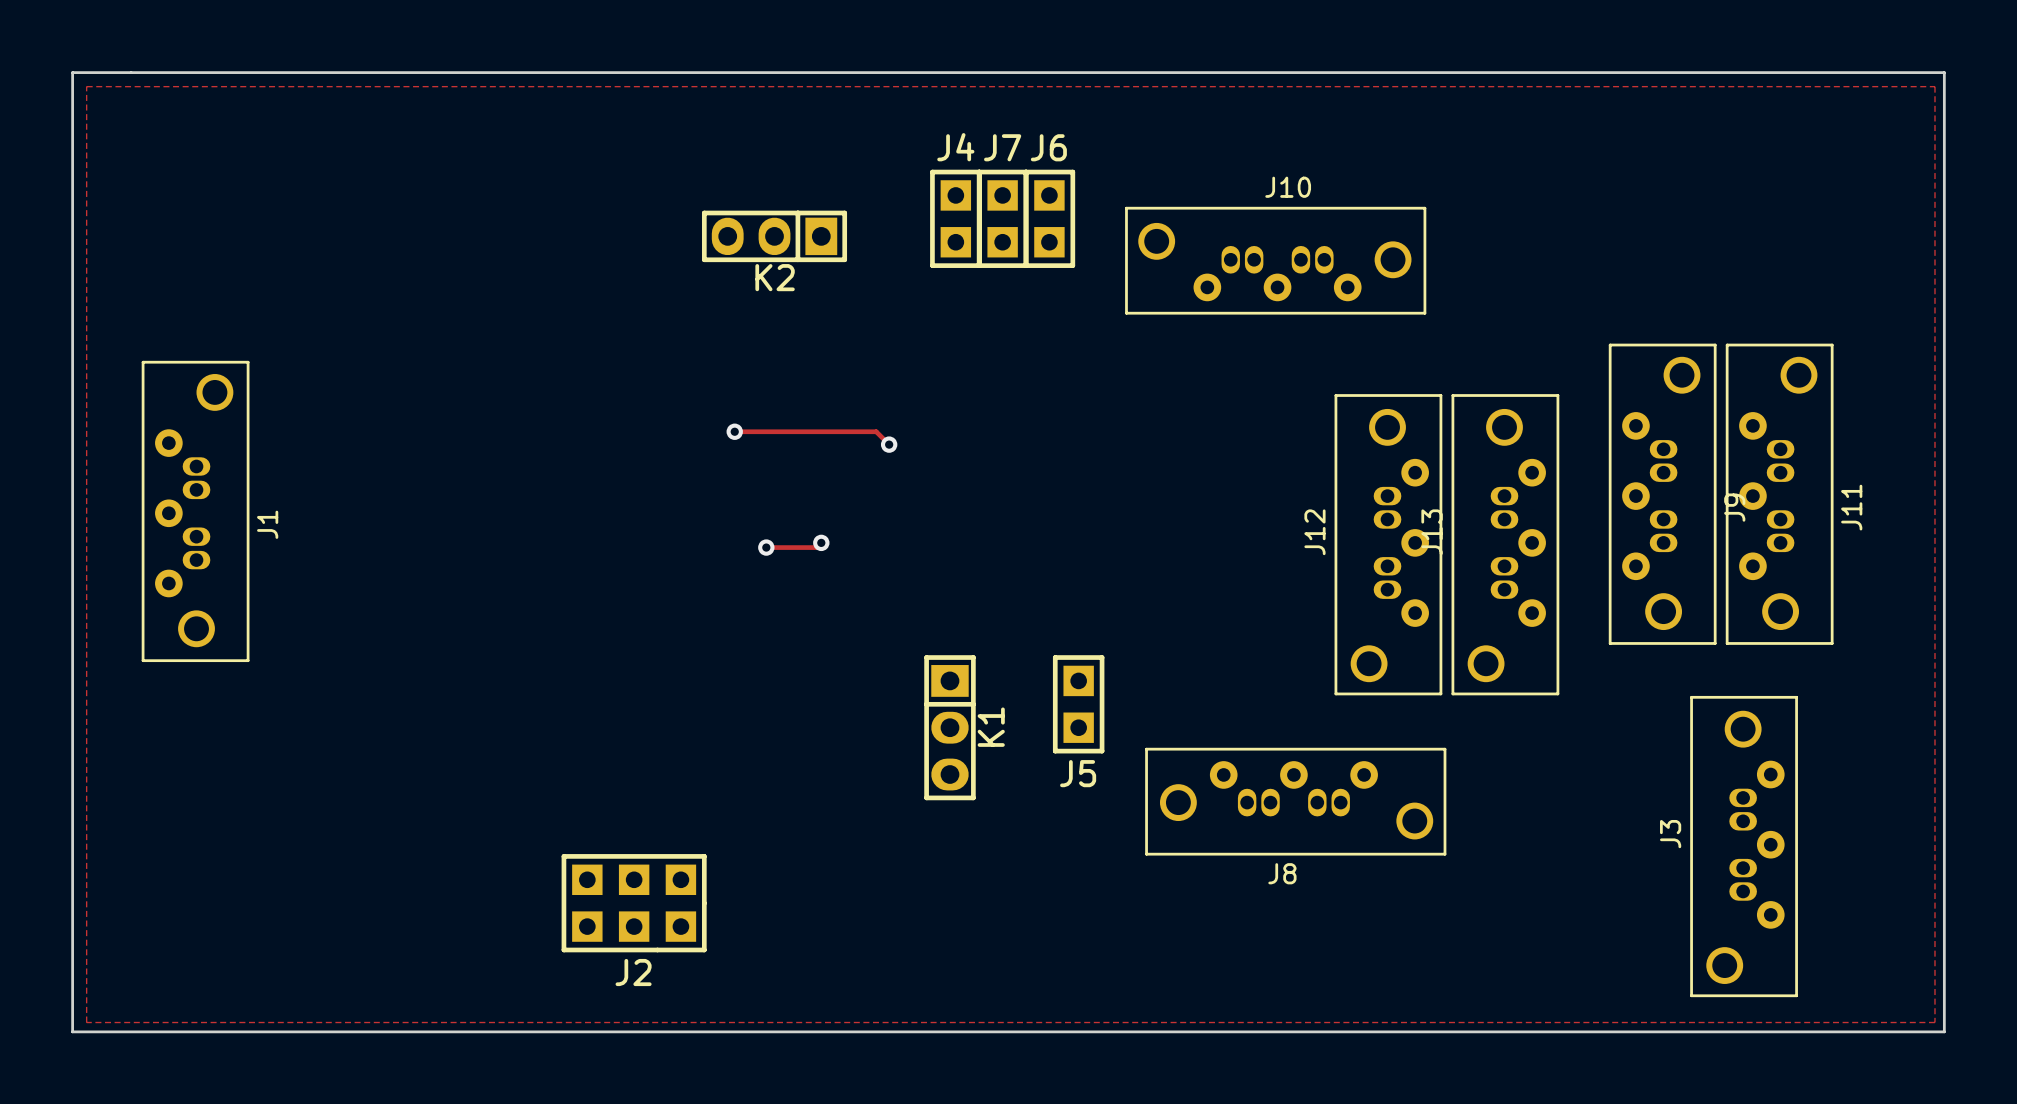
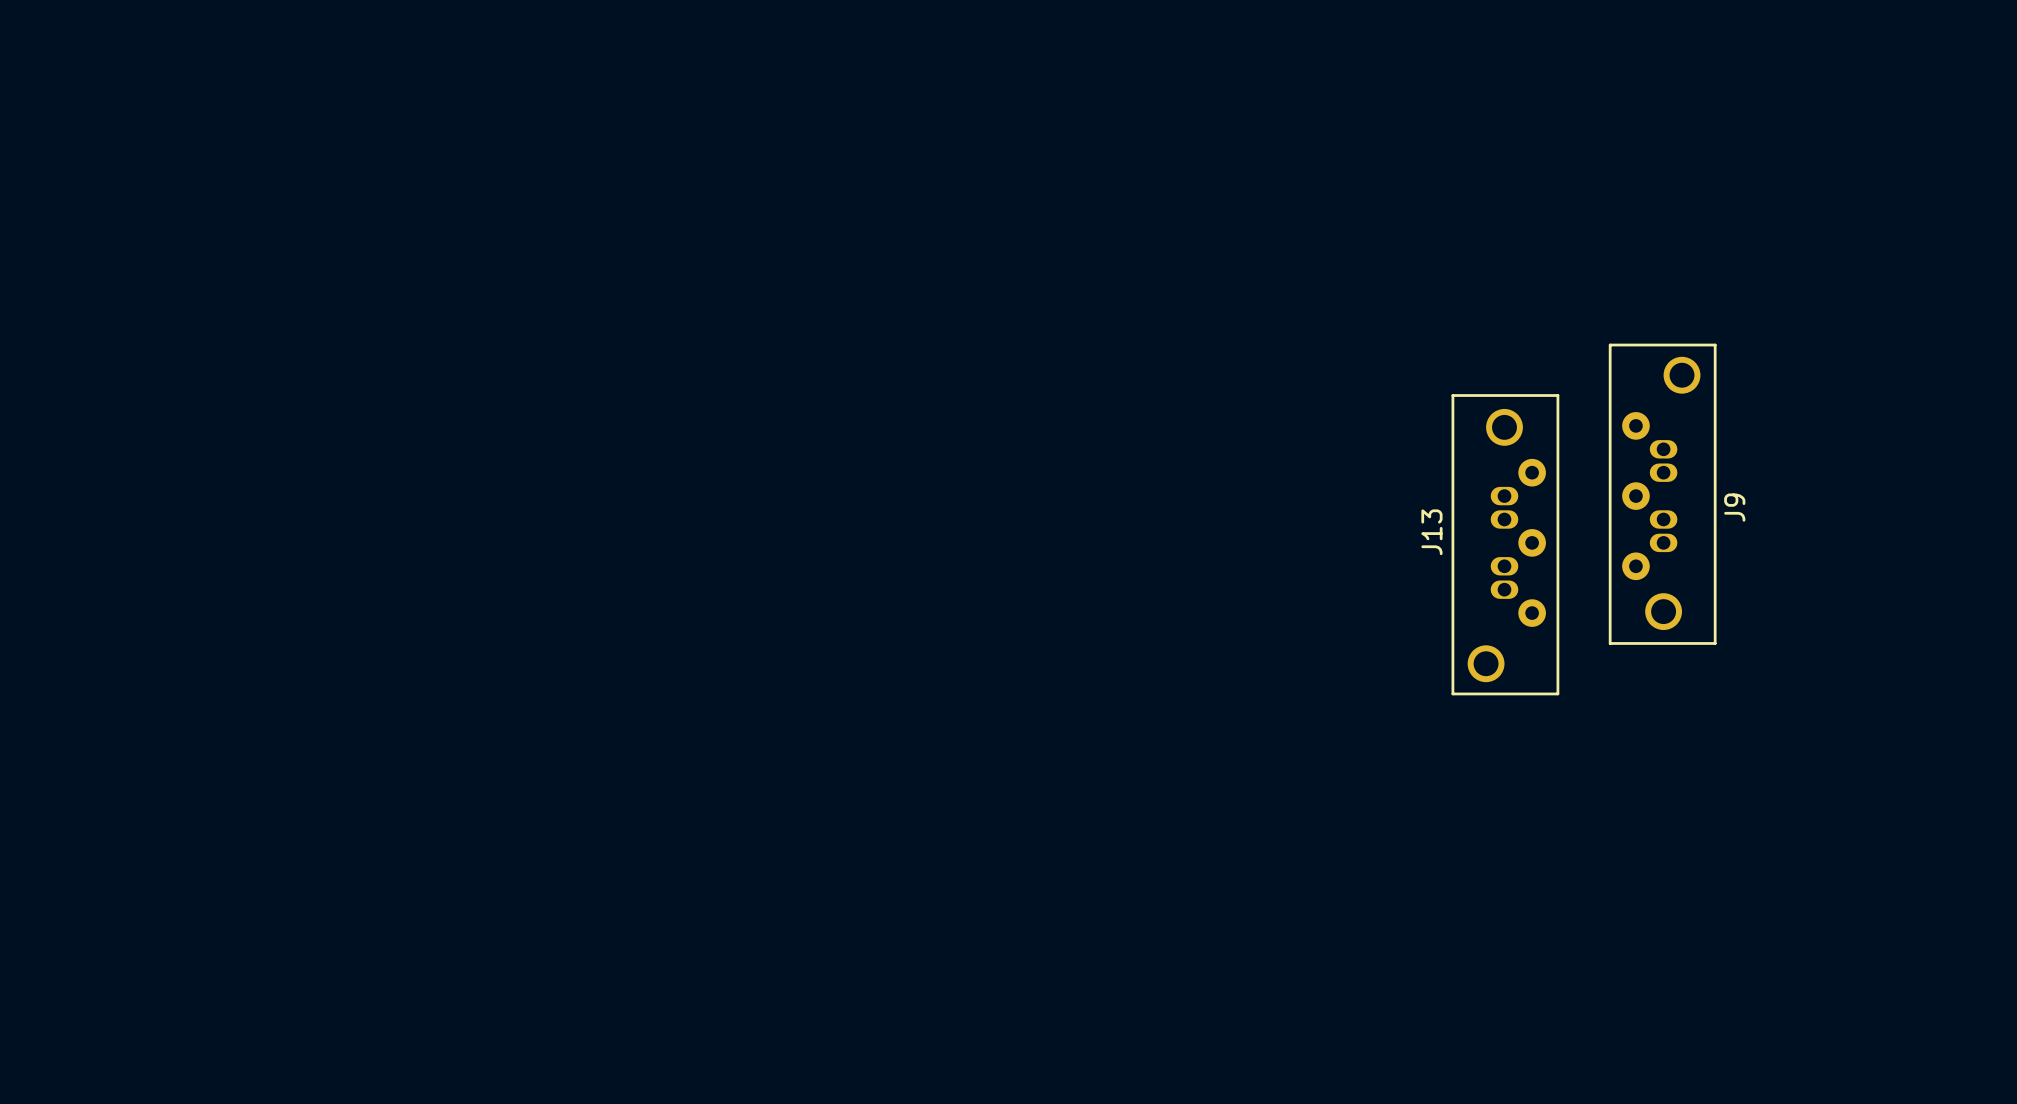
board edge: (72, 72) (1944, 72) (1944, 1031) (72, 1031) (72, 72) -> none
zone outline: (86, 86) (86, 1022) (1934, 1022) (1934, 86) (86, 86) -> none
J4: (955, 218) -> none
J7: (1002, 218) -> none
J6: (1049, 218) -> none
K2: (774, 236) -> none
J10: (1275, 260) -> none
track: (734, 431) (876, 431) (889, 444) -> none
via: (734, 431) -> none
via: (889, 444) -> none
J11: (1779, 494) -> none
J1: (195, 511) -> none
track: (821, 542) (816, 547) (766, 547) -> none
via: (821, 542) -> none
J12: (1388, 544) -> none
via: (766, 547) -> none
J5: (1078, 704) -> none
K1: (949, 727) -> none
J8: (1295, 801) -> none
J3: (1744, 846) -> none
J2: (634, 903) -> none

